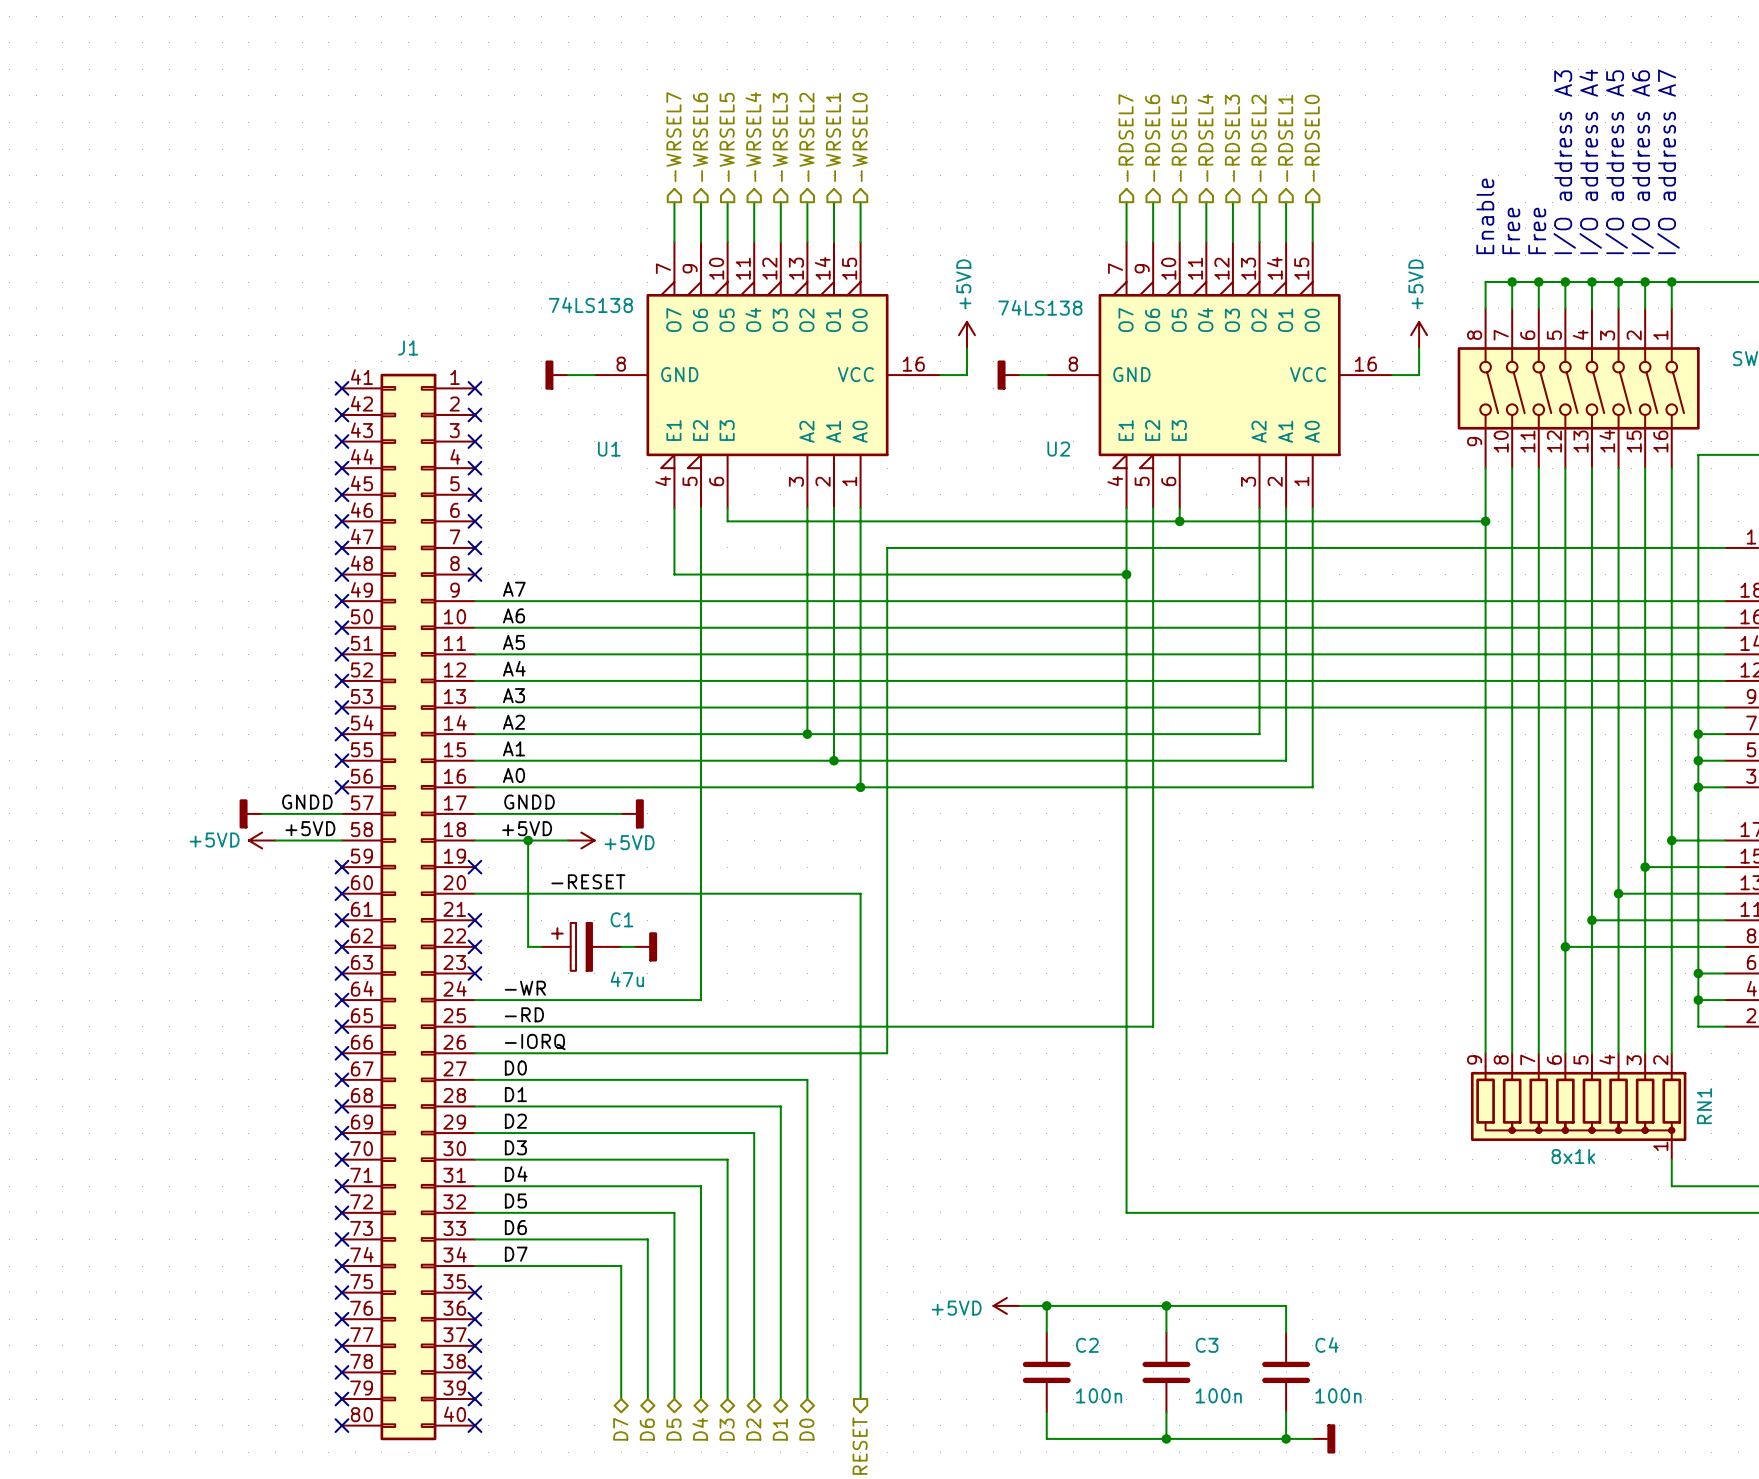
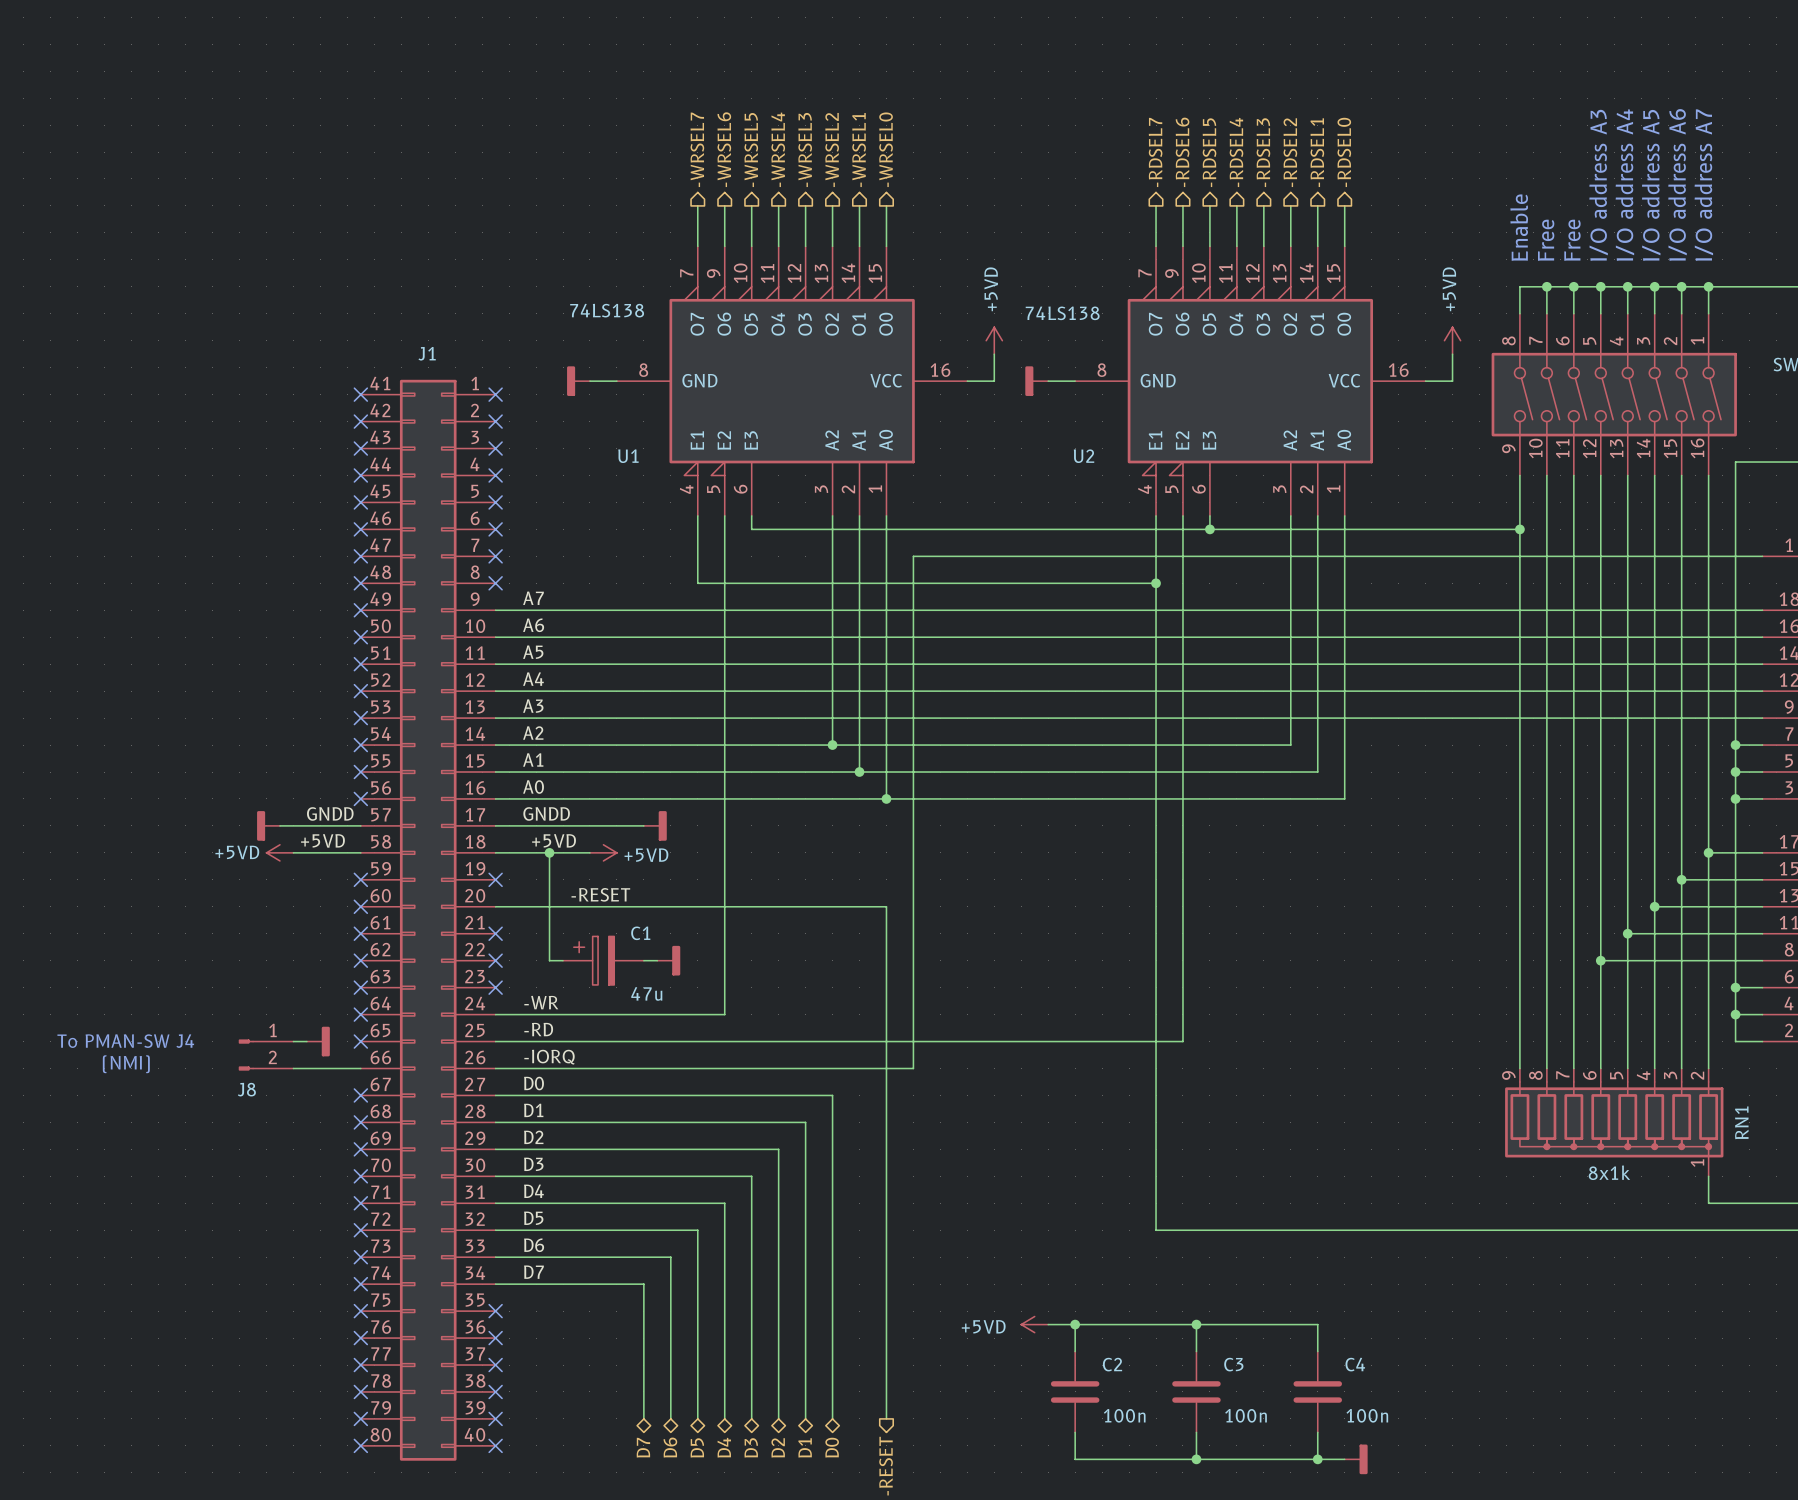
text: none -> To PMAN-SW J4 (125, 1041)
wire: none -> (293, 1041) (306, 1041)
power symbol: none -> (318, 1041)
J8: none -> (266, 1055)
text: none -> (NMI) (126, 1064)
wire: none -> (293, 1068) (360, 1068)
no-connect mark: (341, 1053) -> none

